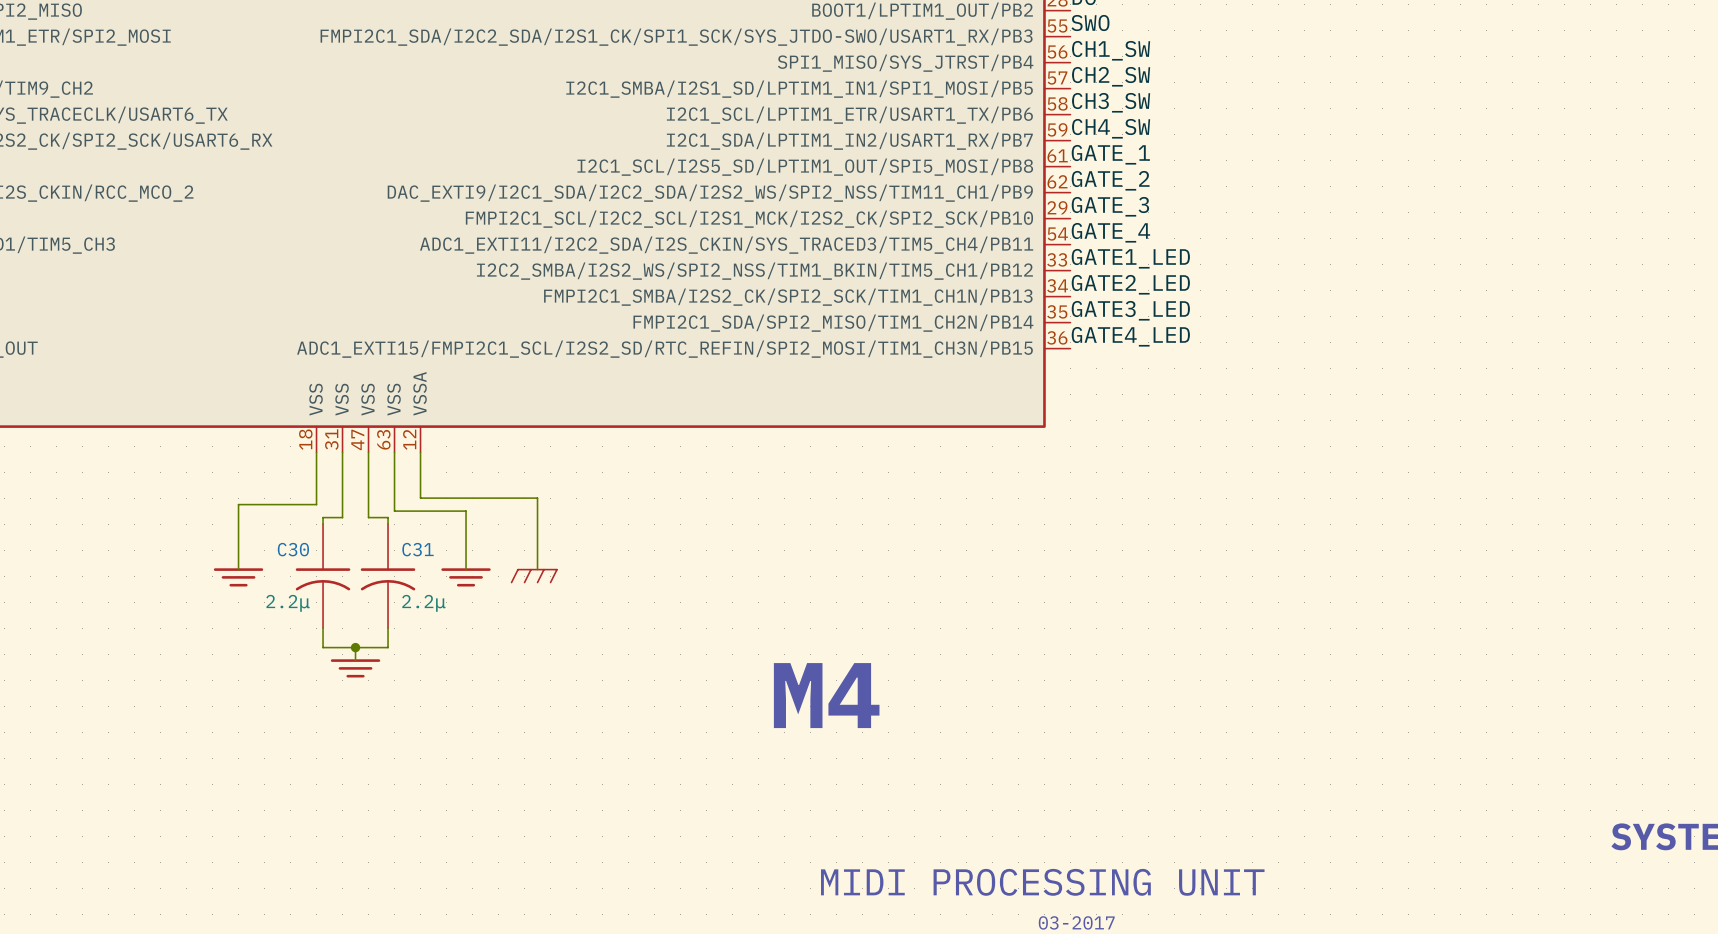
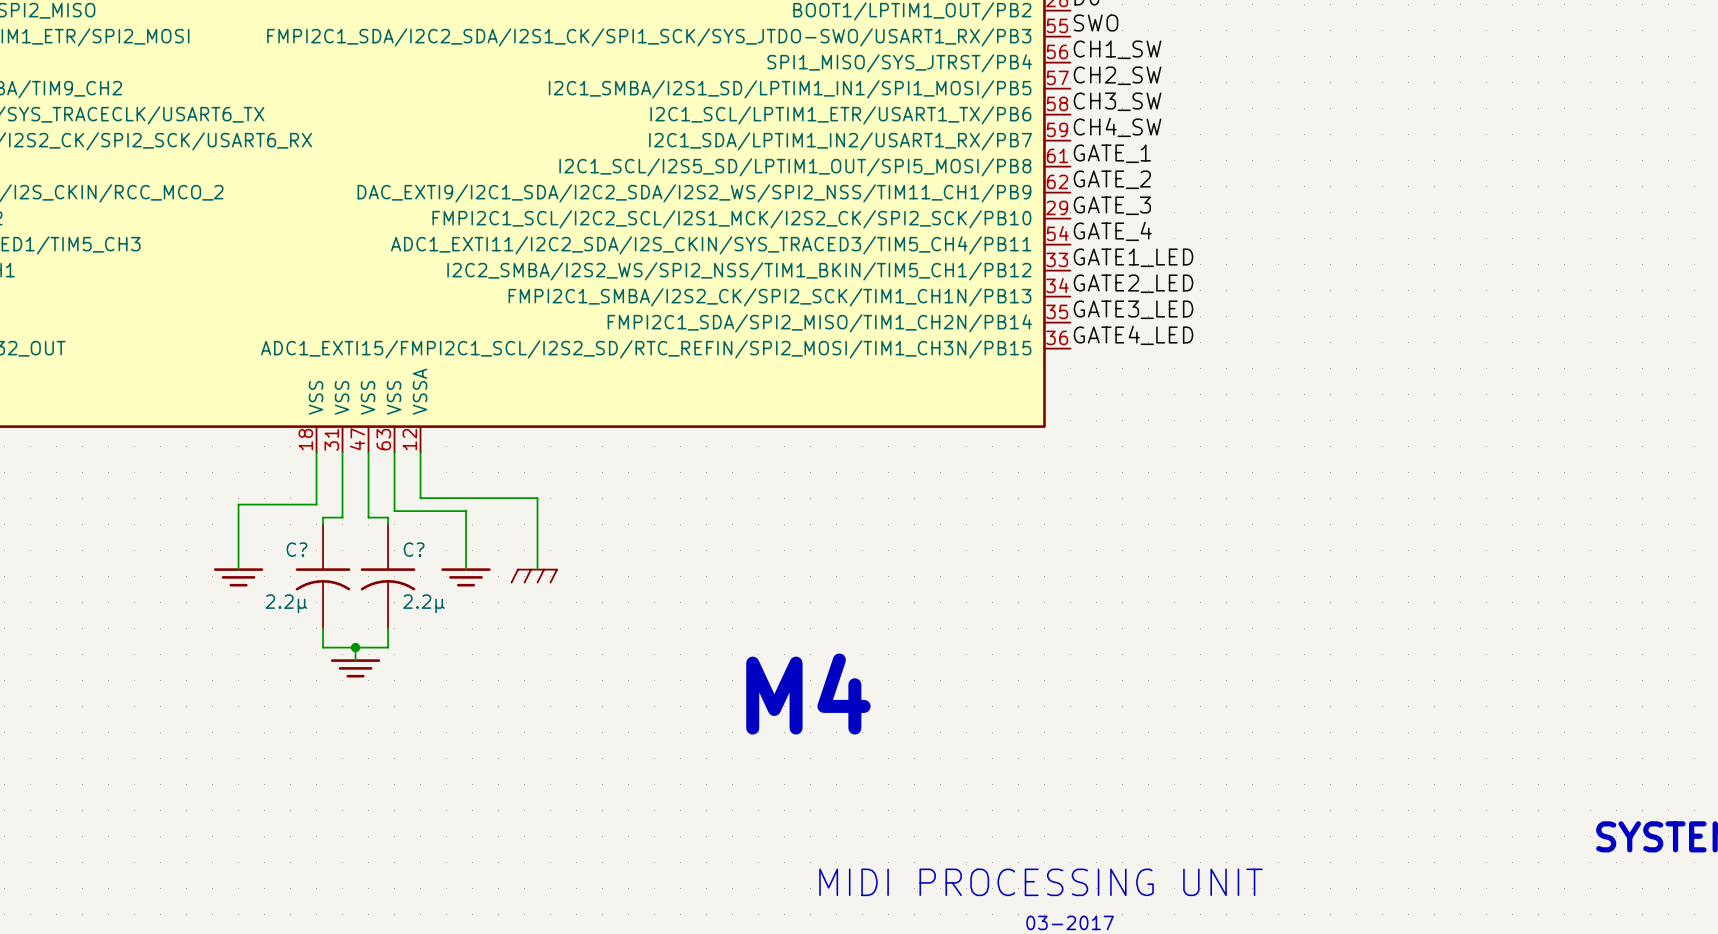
C30 name: C30 (293, 549) -> C? (296, 549)
C31 name: C31 (418, 549) -> C? (414, 549)

